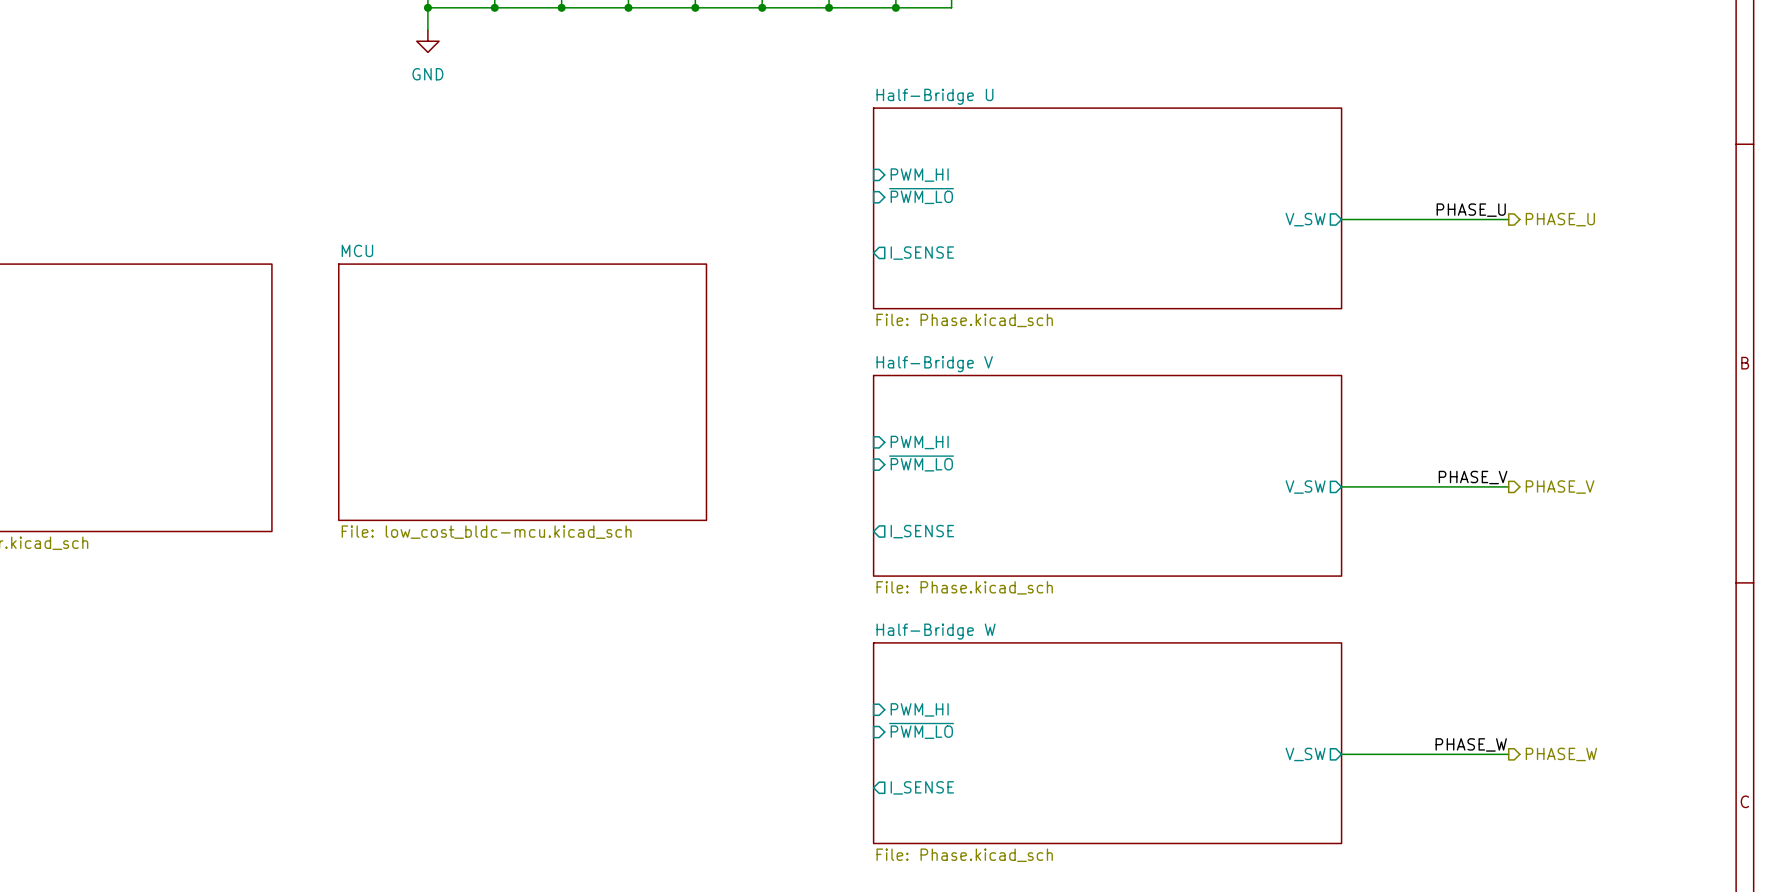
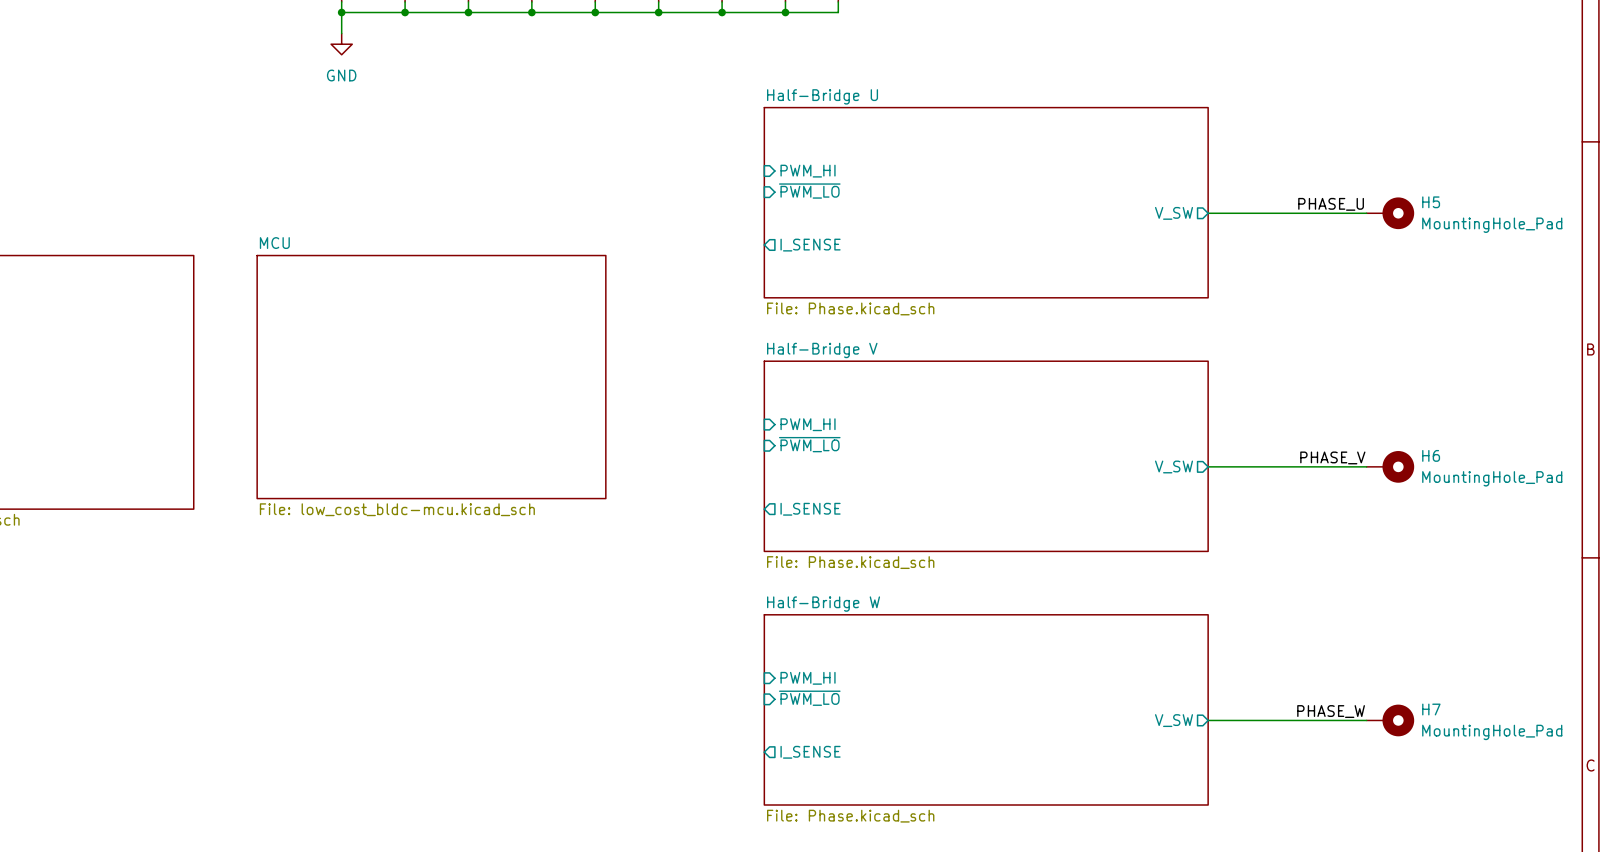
H5: none -> MountingHole_Pad (1390, 213)
hierarchical label: PHASE_U (1560, 219) -> none
H6: none -> MountingHole_Pad (1390, 466)
hierarchical label: PHASE_V (1560, 487) -> none
H7: none -> MountingHole_Pad (1390, 720)
hierarchical label: PHASE_W (1561, 754) -> none

